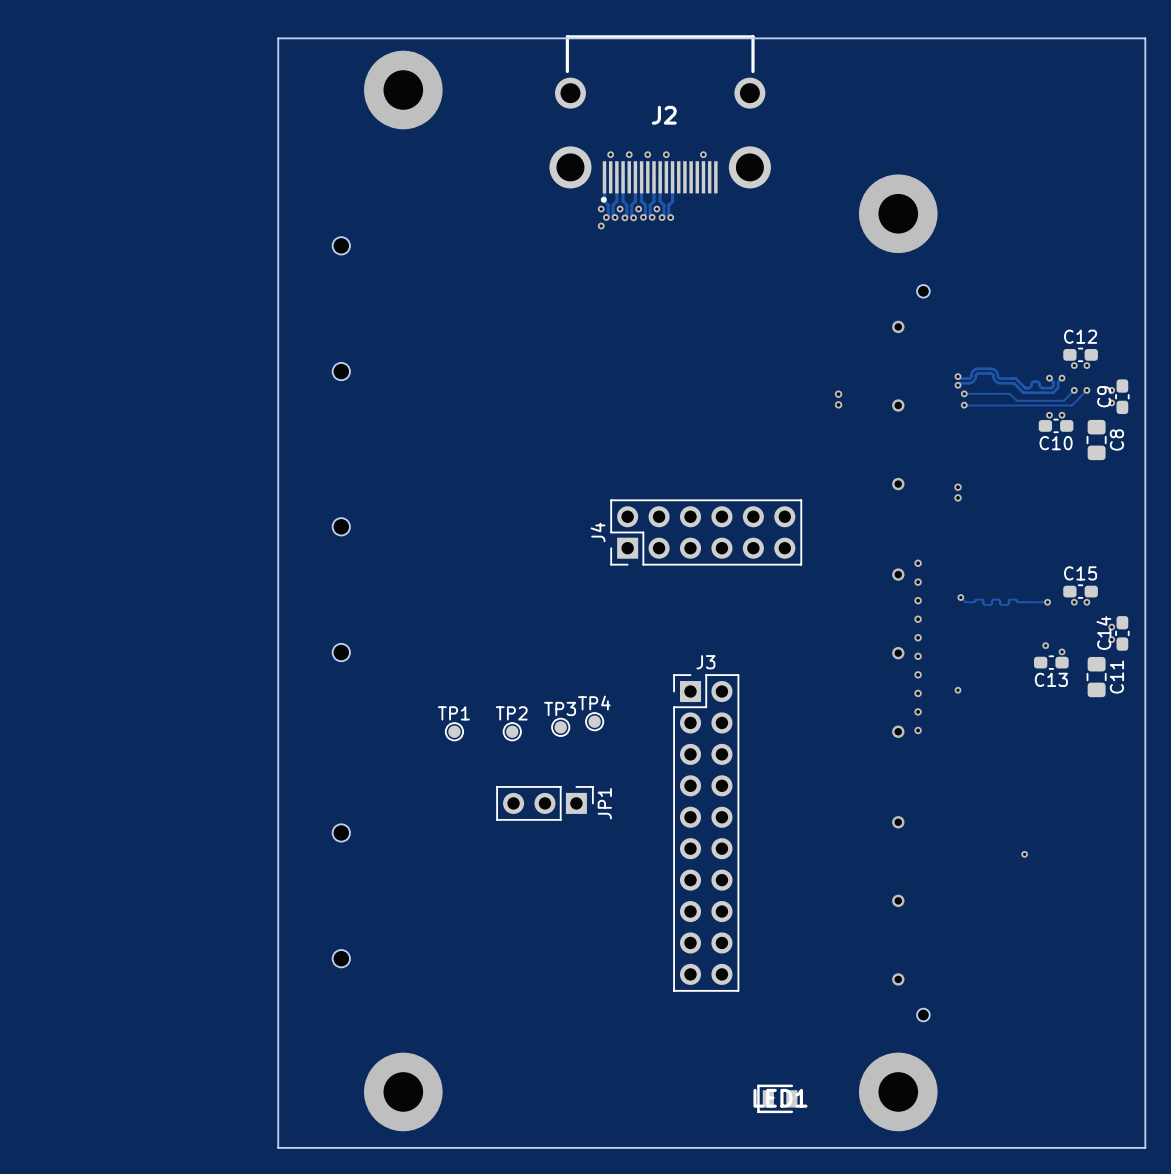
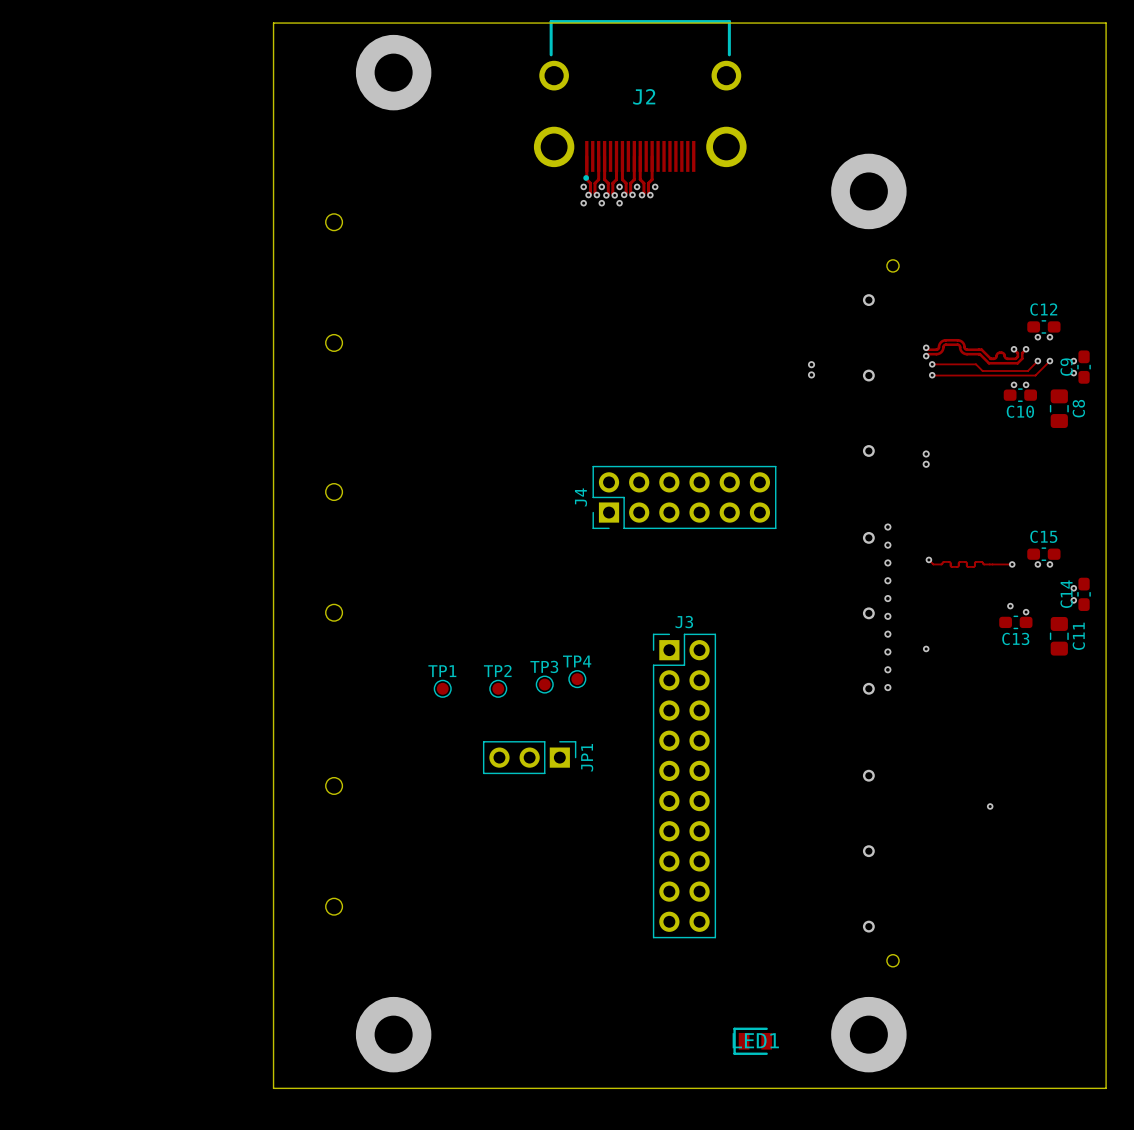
via: (610, 154) -> none
via: (629, 154) -> none
via: (647, 154) -> none
via: (666, 154) -> none
via: (703, 154) -> none
via: none -> (655, 186)
via: none -> (601, 203)
via: none -> (619, 203)

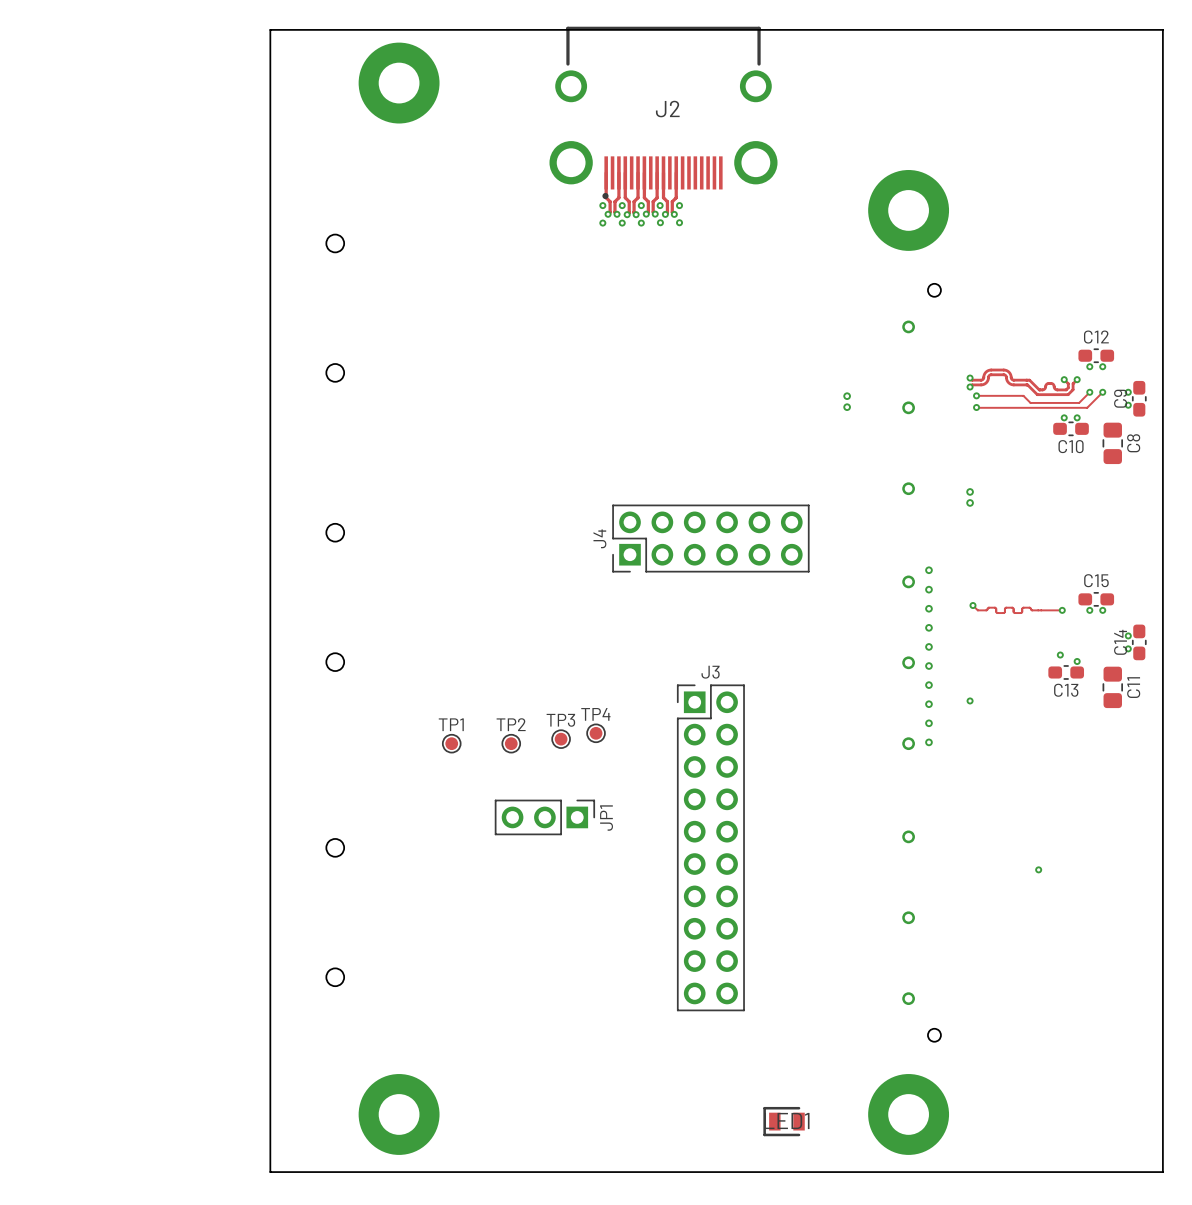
via: none -> (660, 222)
via: none -> (679, 222)

